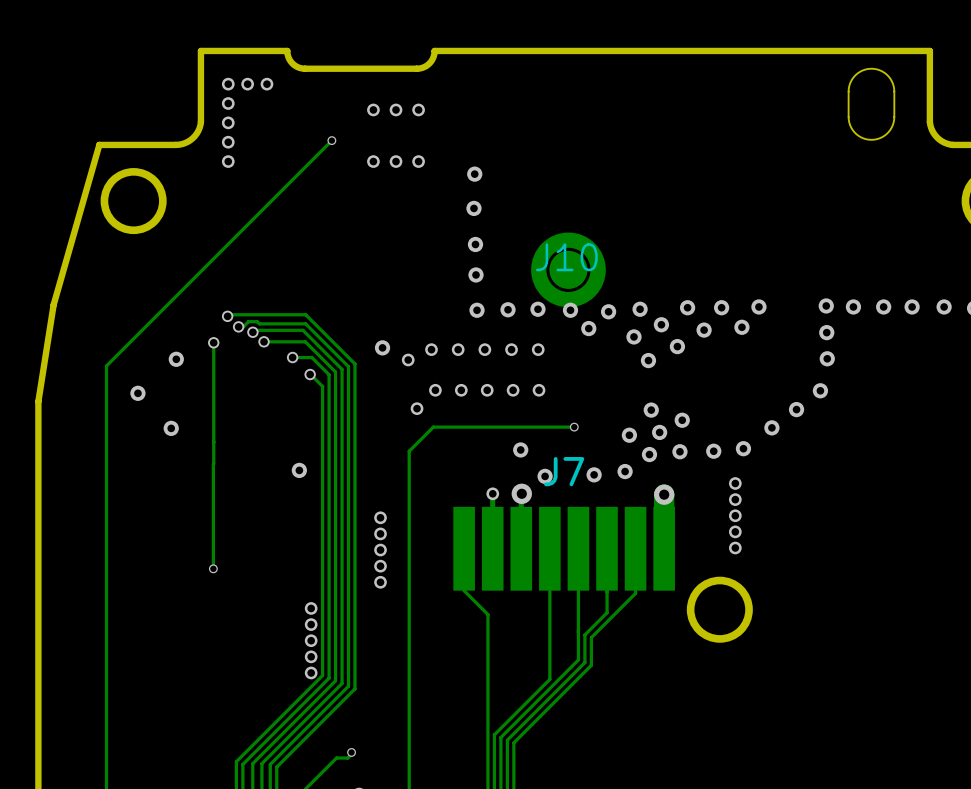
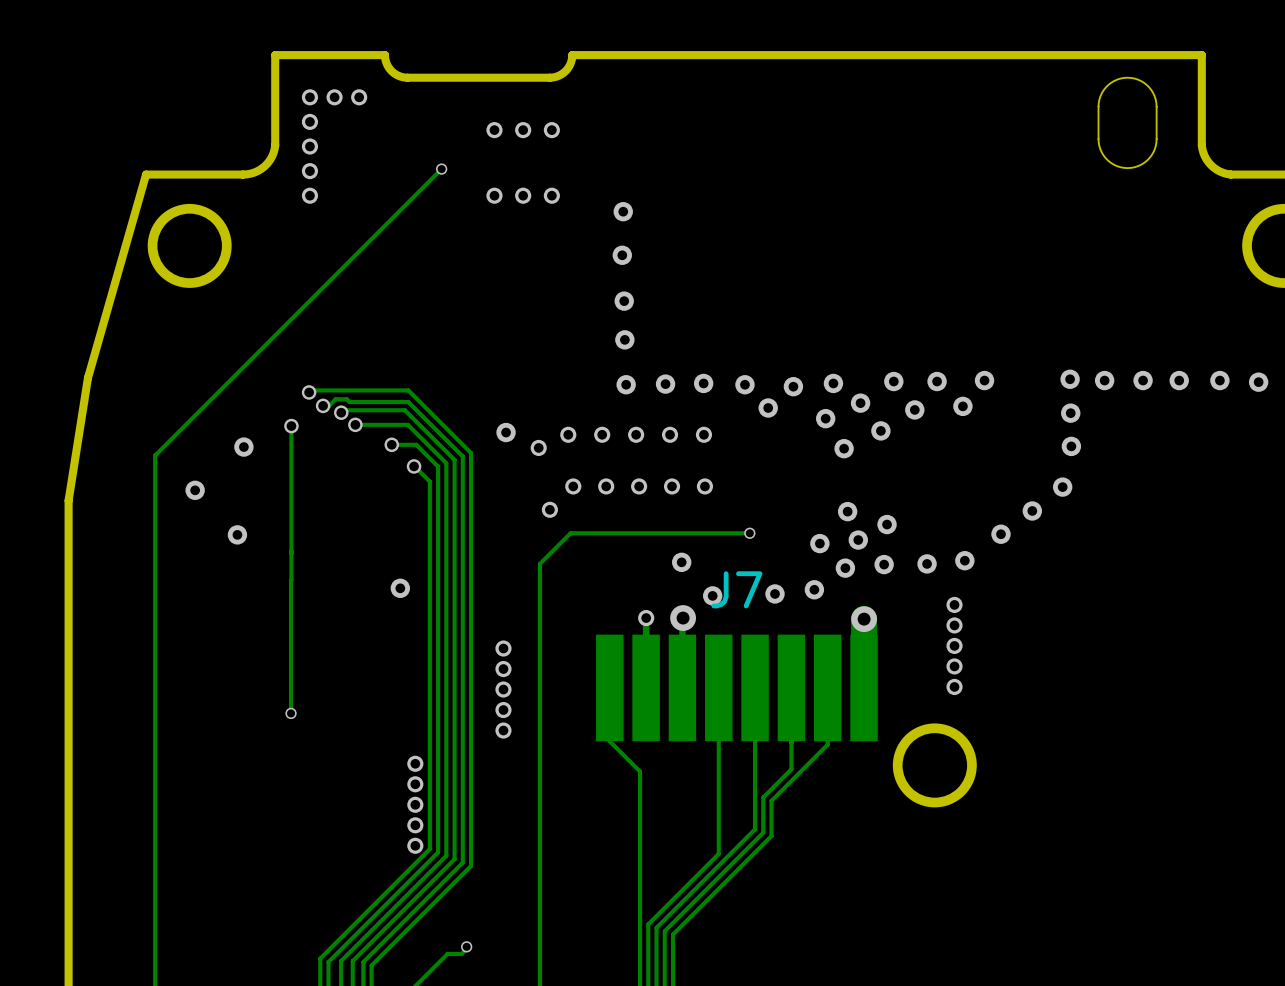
J10: (568, 269) -> none

